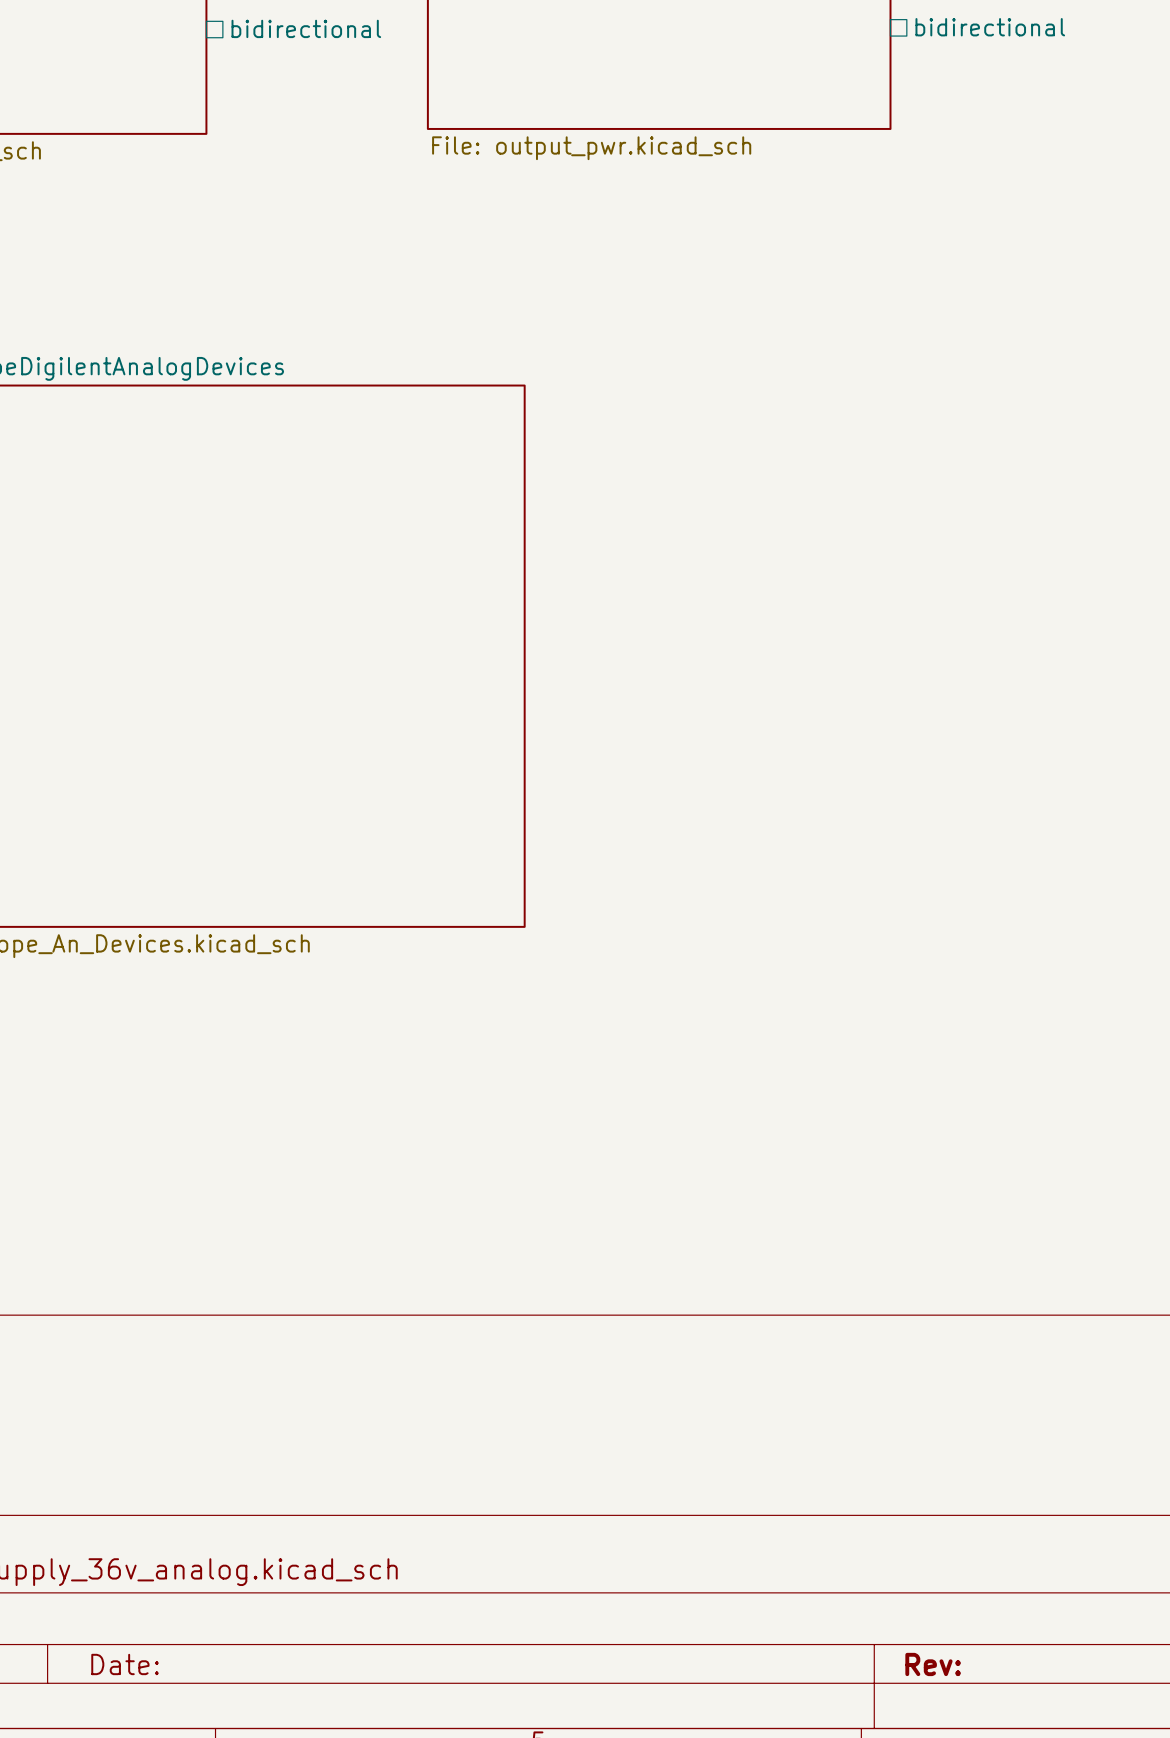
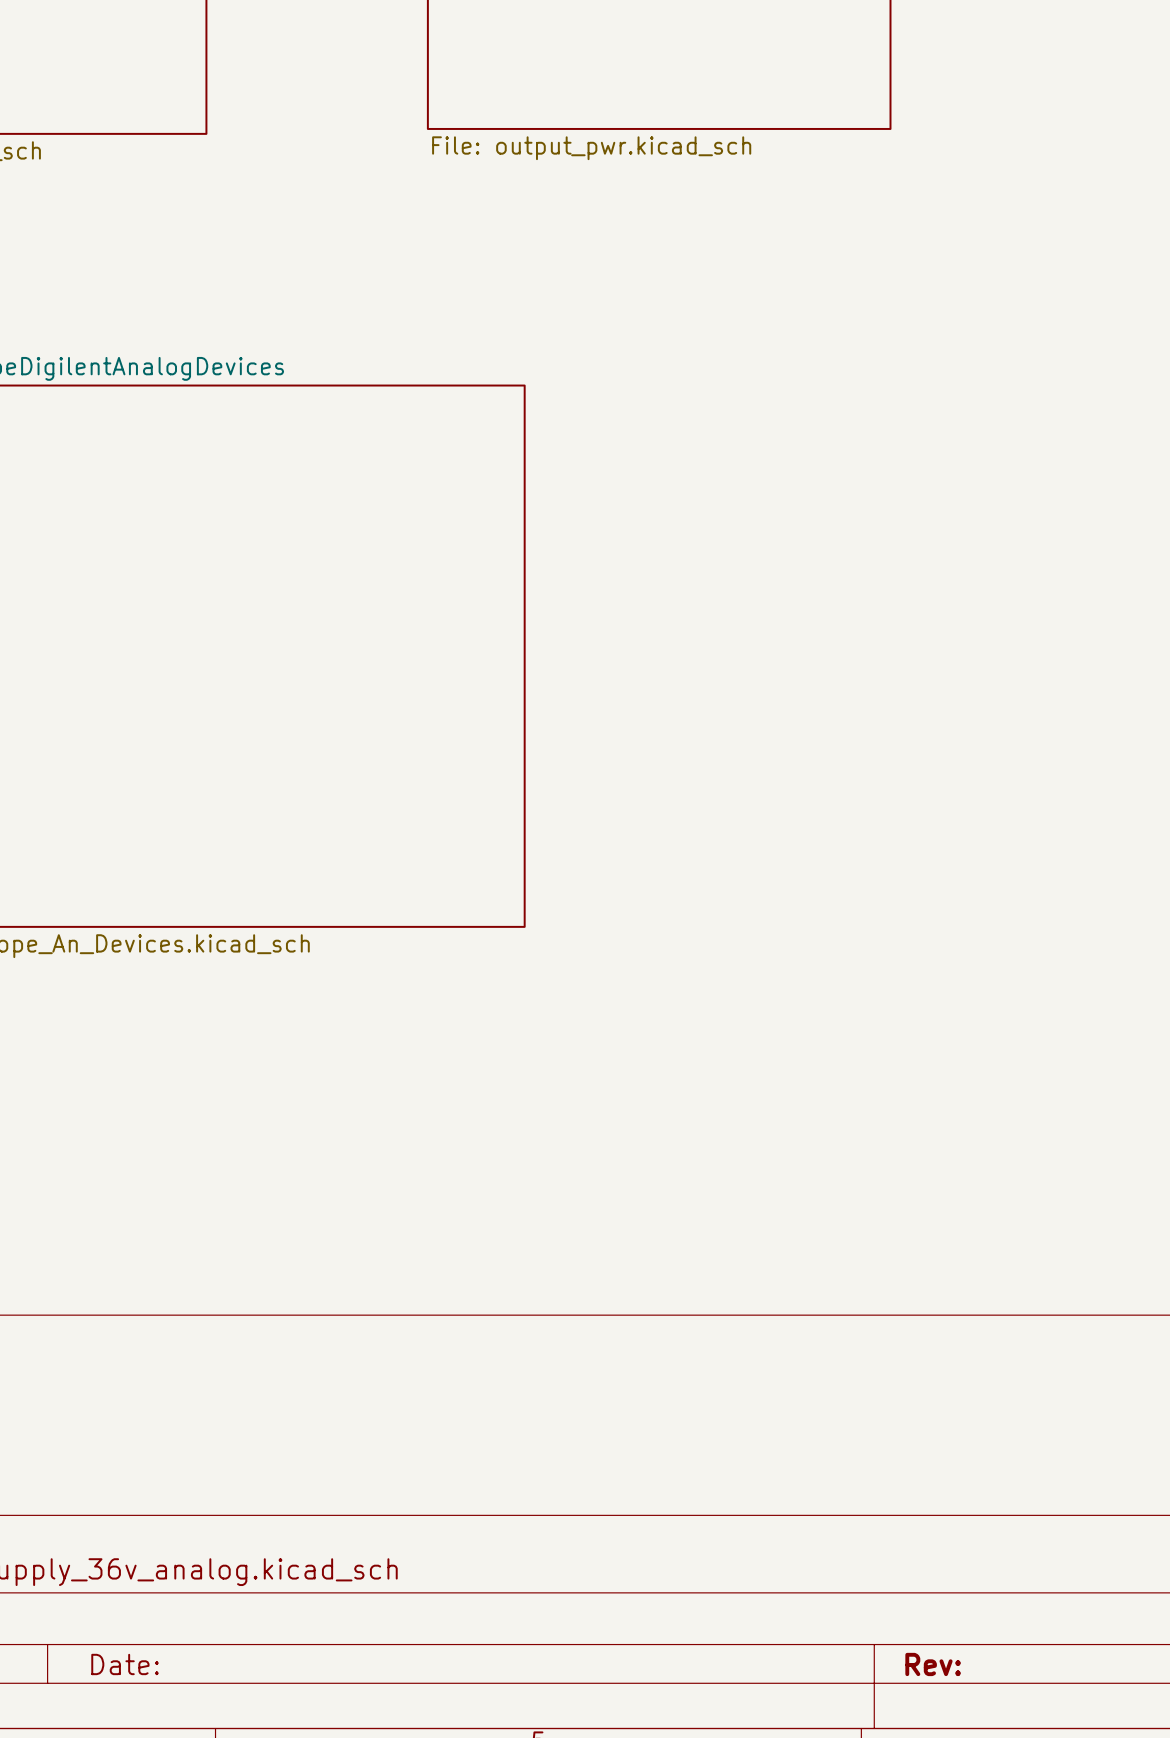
sheet pin: bidirectional (990, 27) -> none
sheet pin: bidirectional (306, 28) -> none

